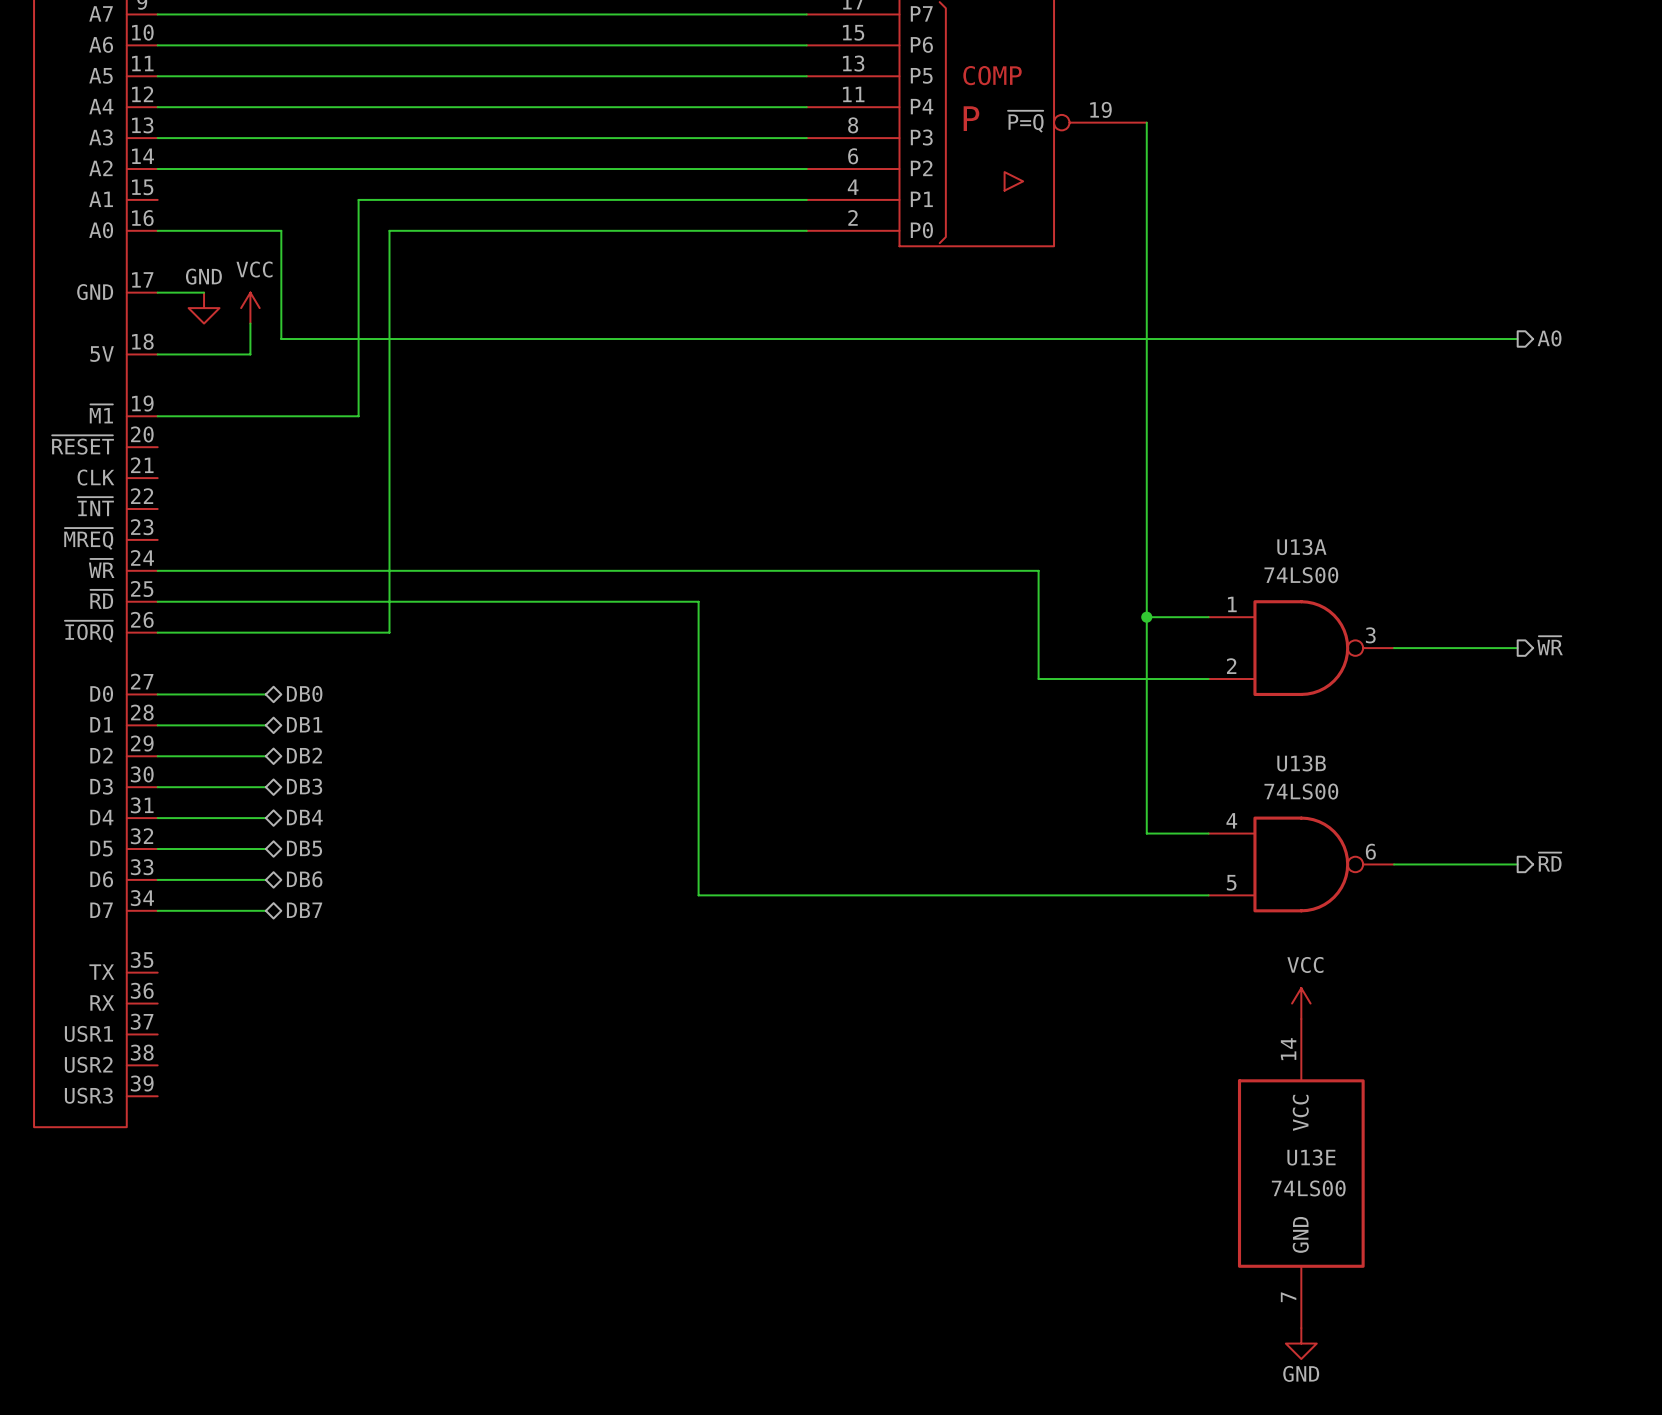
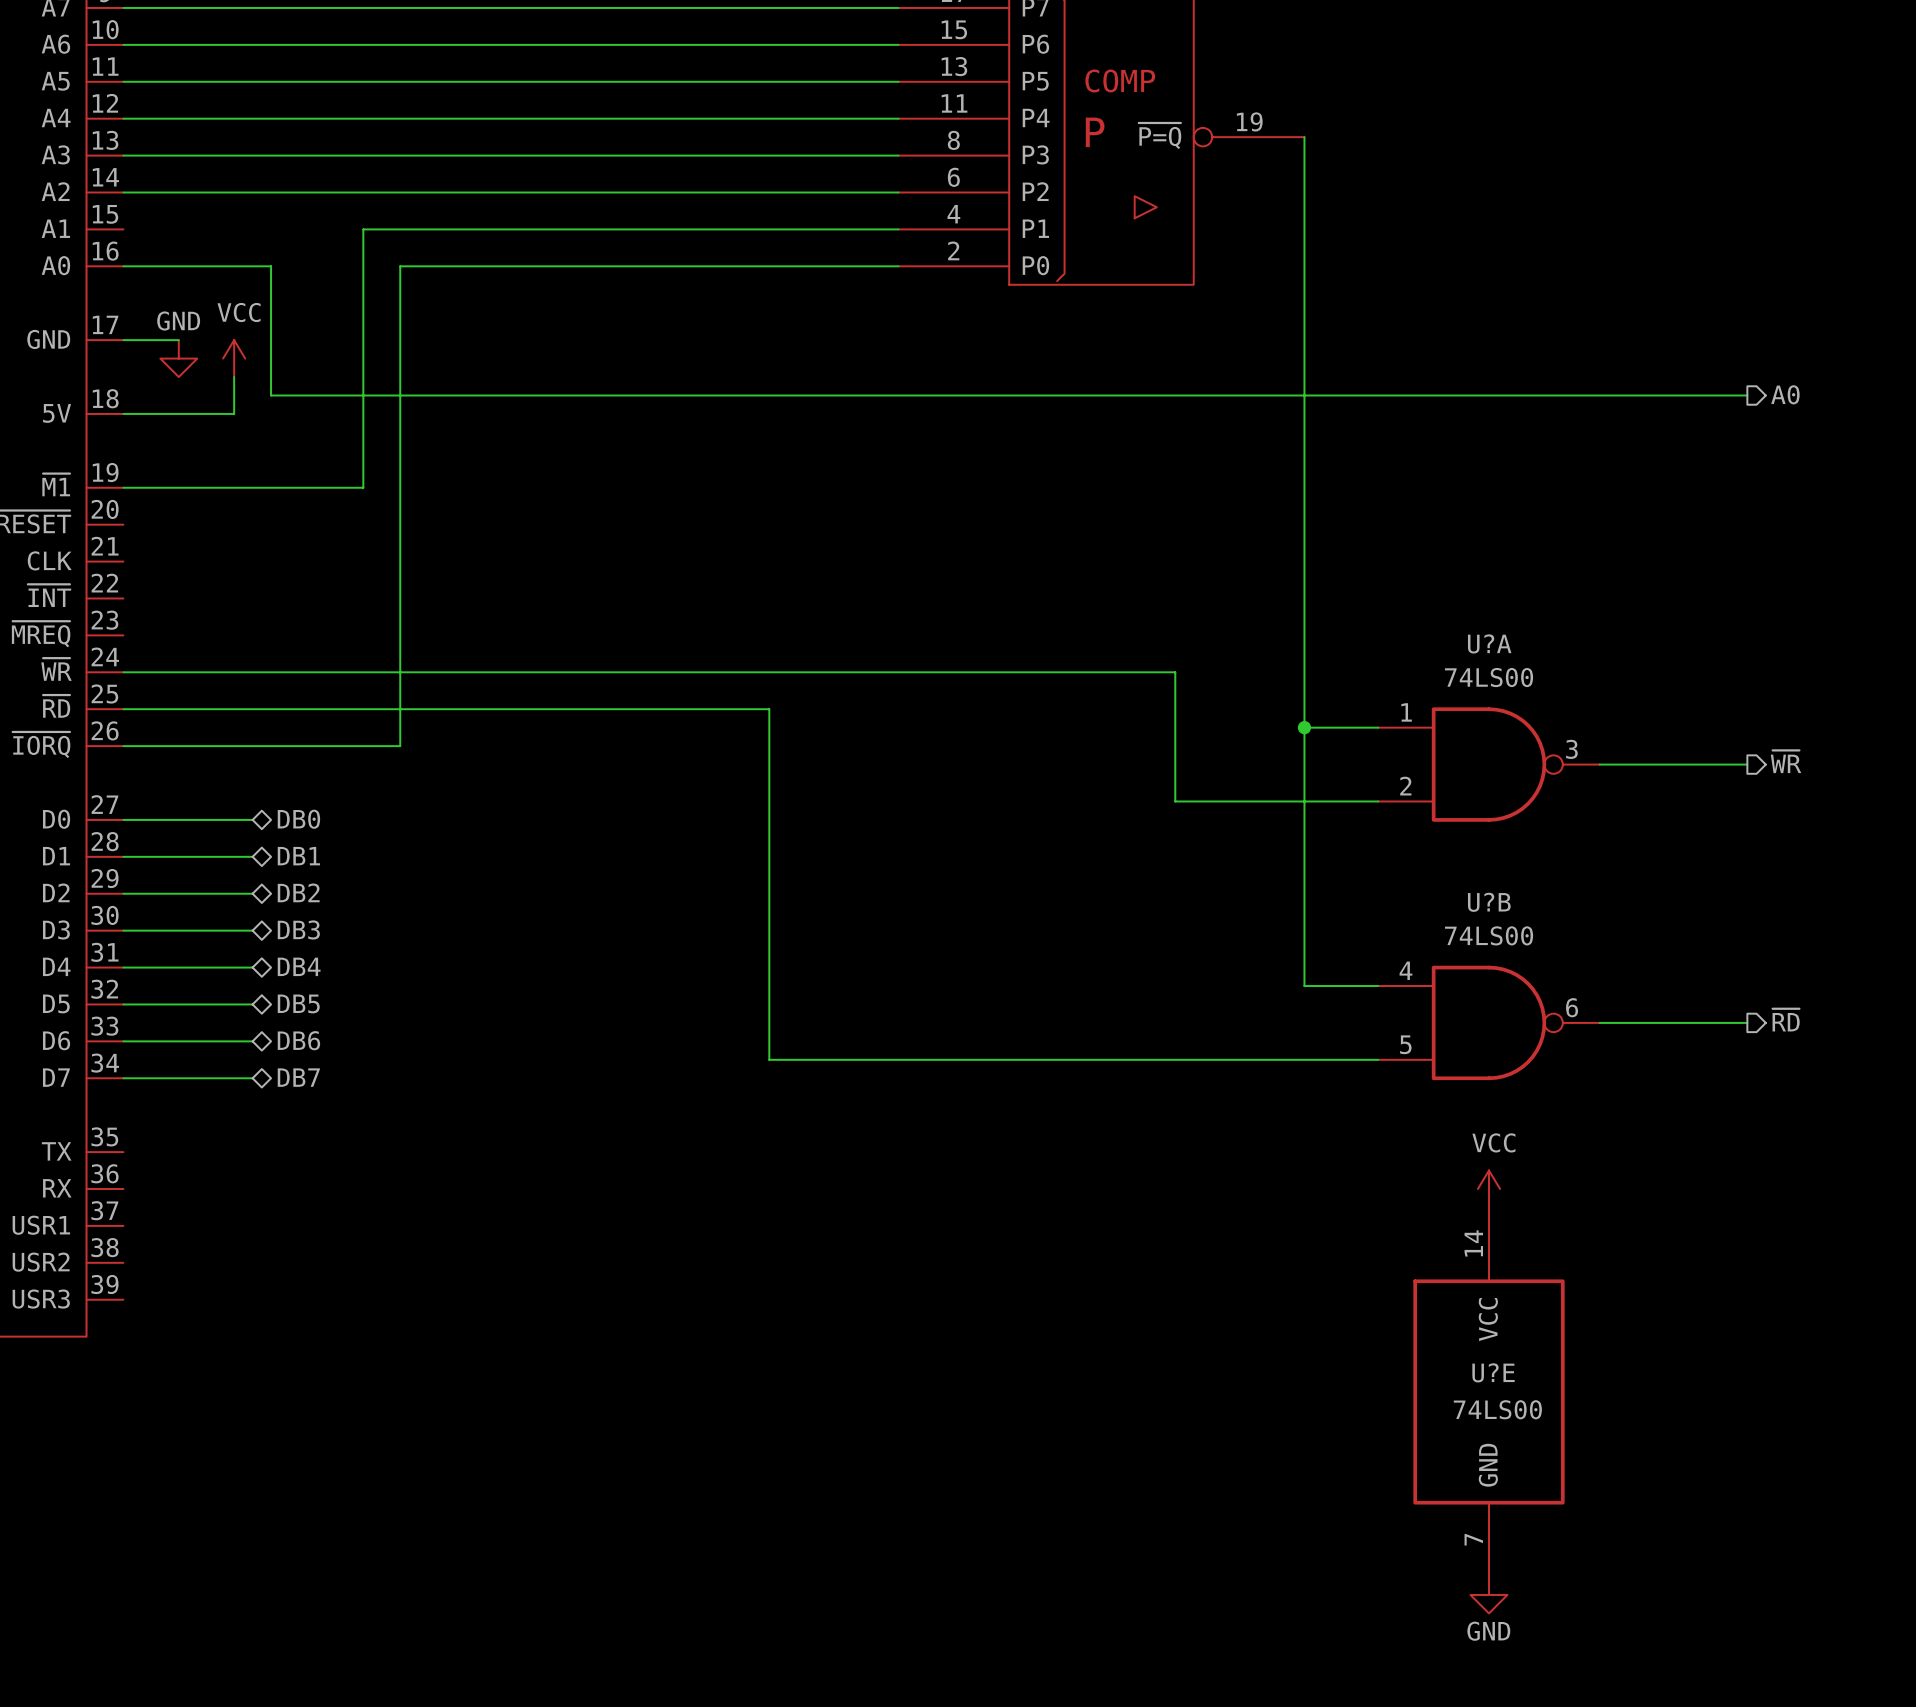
U13A name: U13A (1301, 547) -> U?A (1489, 643)
U13B name: U13B (1301, 763) -> U?B (1489, 902)
U13E name: U13E (1311, 1157) -> U?E (1493, 1372)

